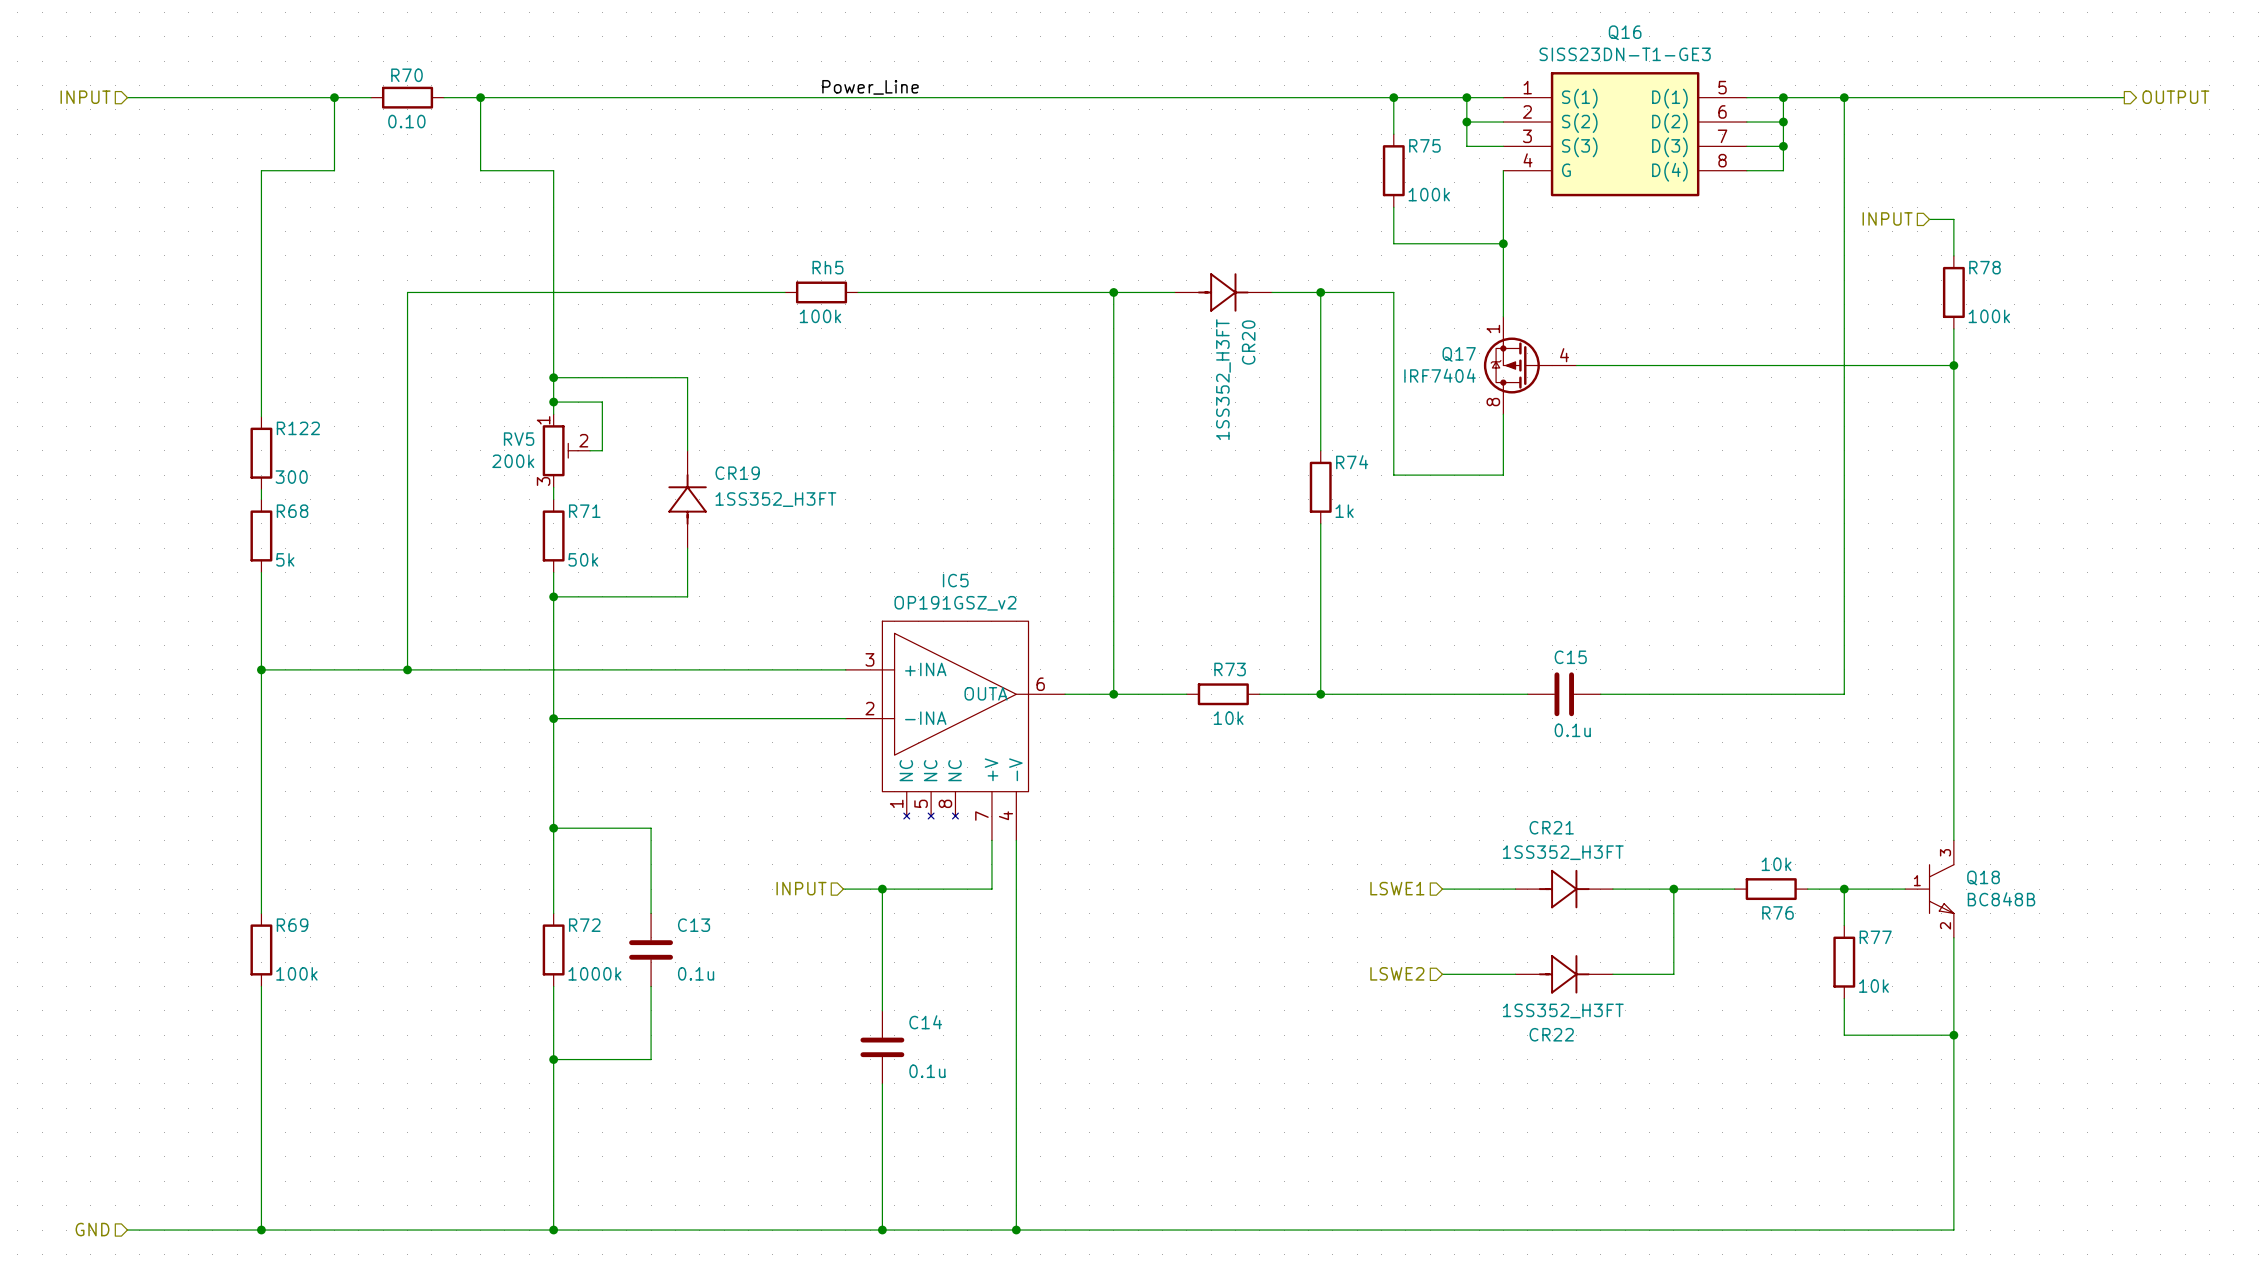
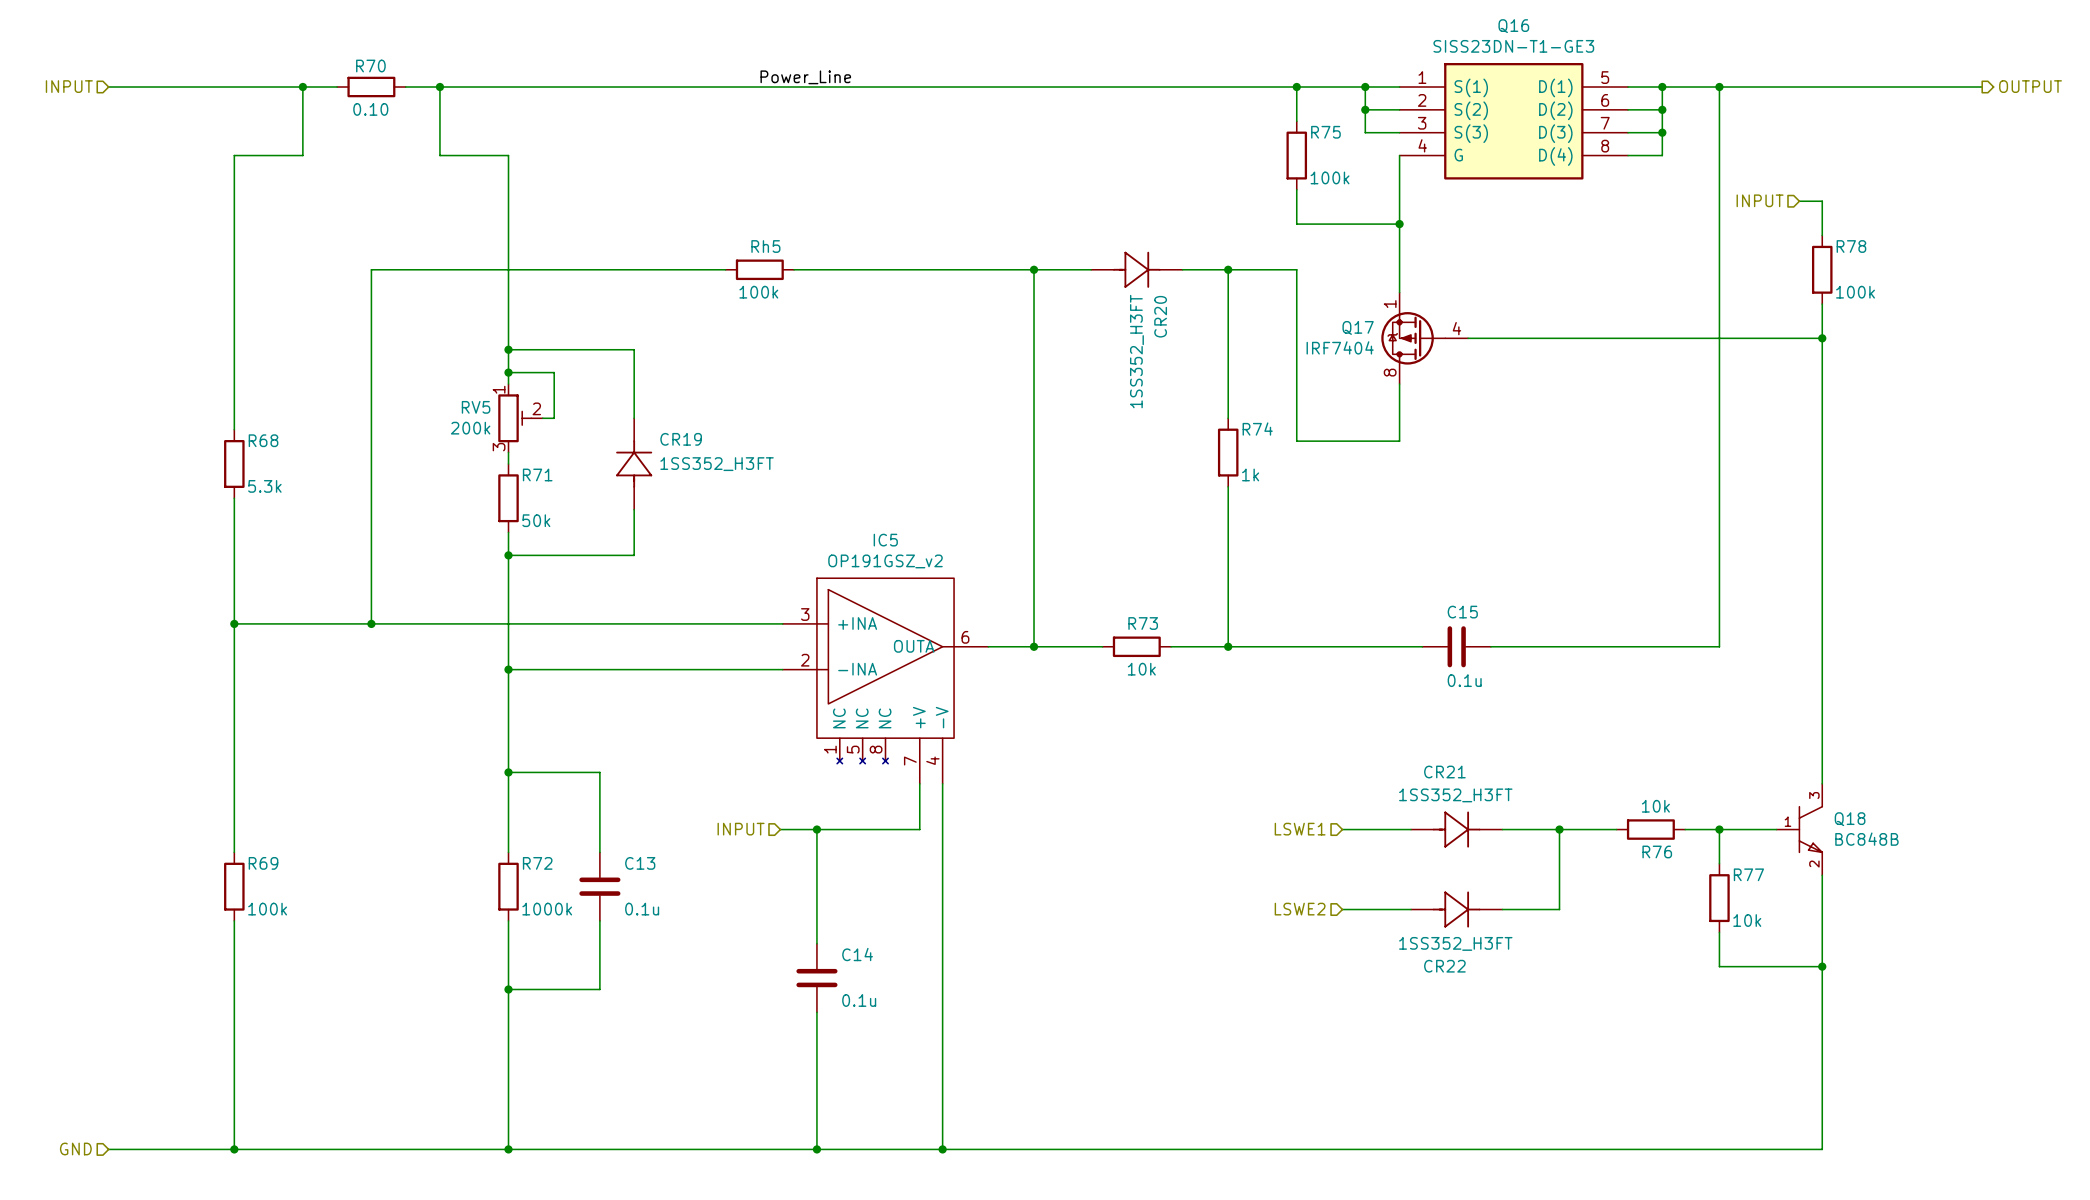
wire: none -> (234, 386) (234, 429)
R122: 300 (261, 453) -> none
wire: (261, 489) (261, 499) -> none
wire: none -> (234, 498) (234, 532)
R68 position: (261, 535) -> (234, 463)
R68 value: 5k (285, 559) -> 5.3k (264, 486)

